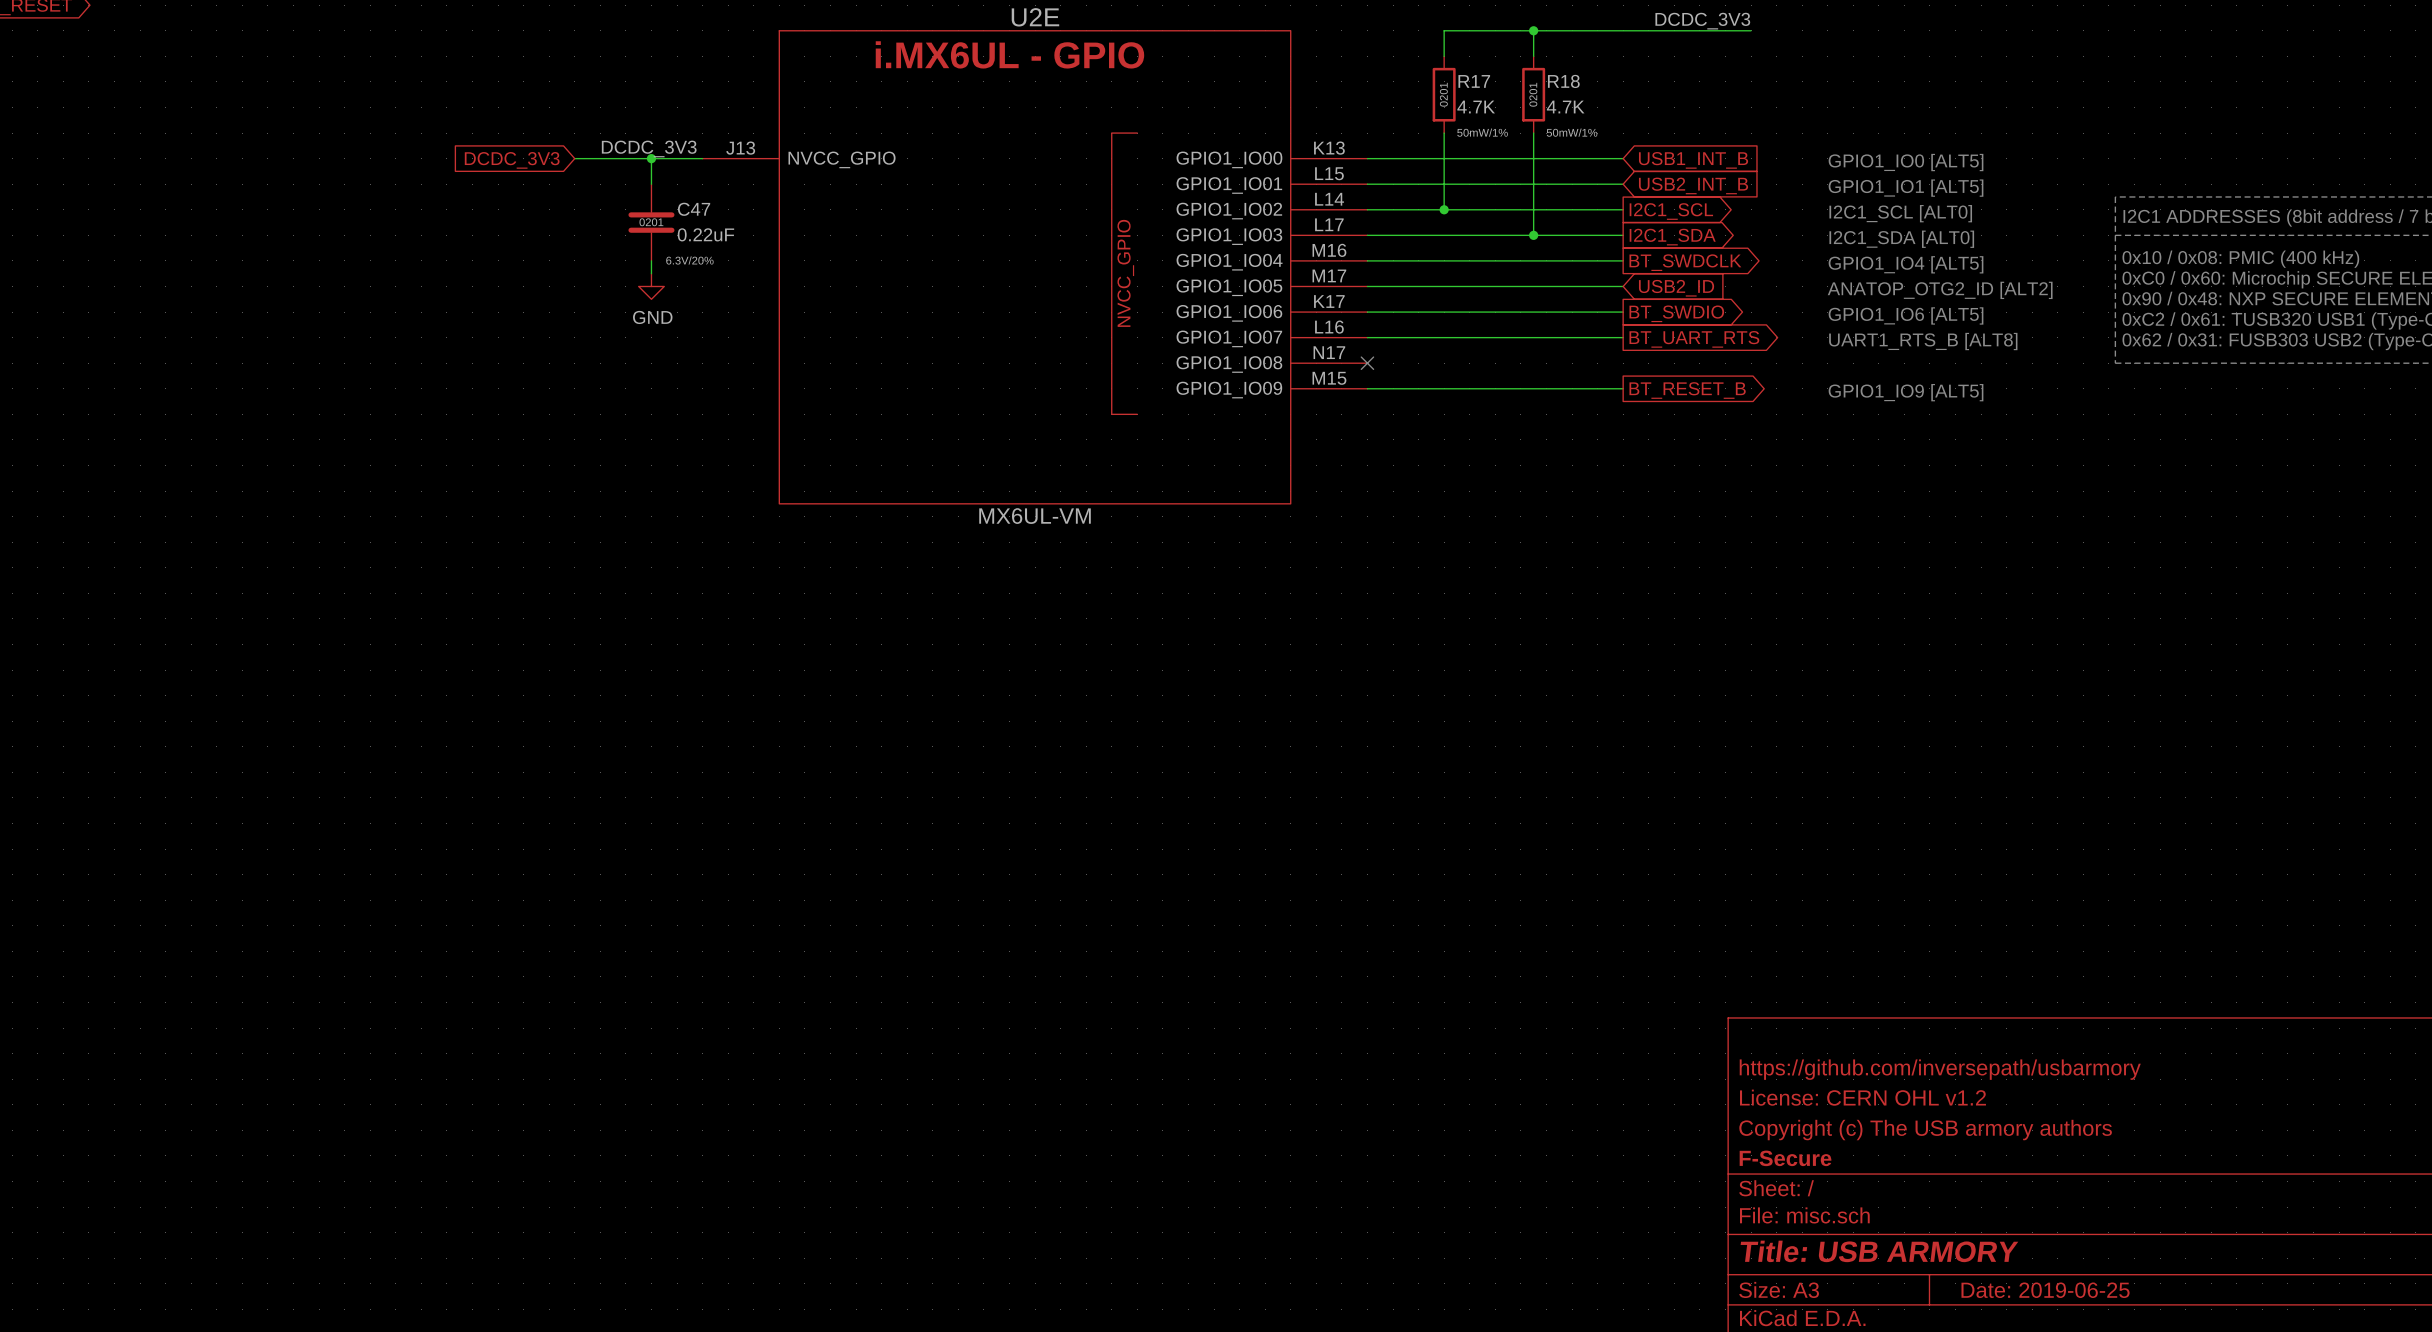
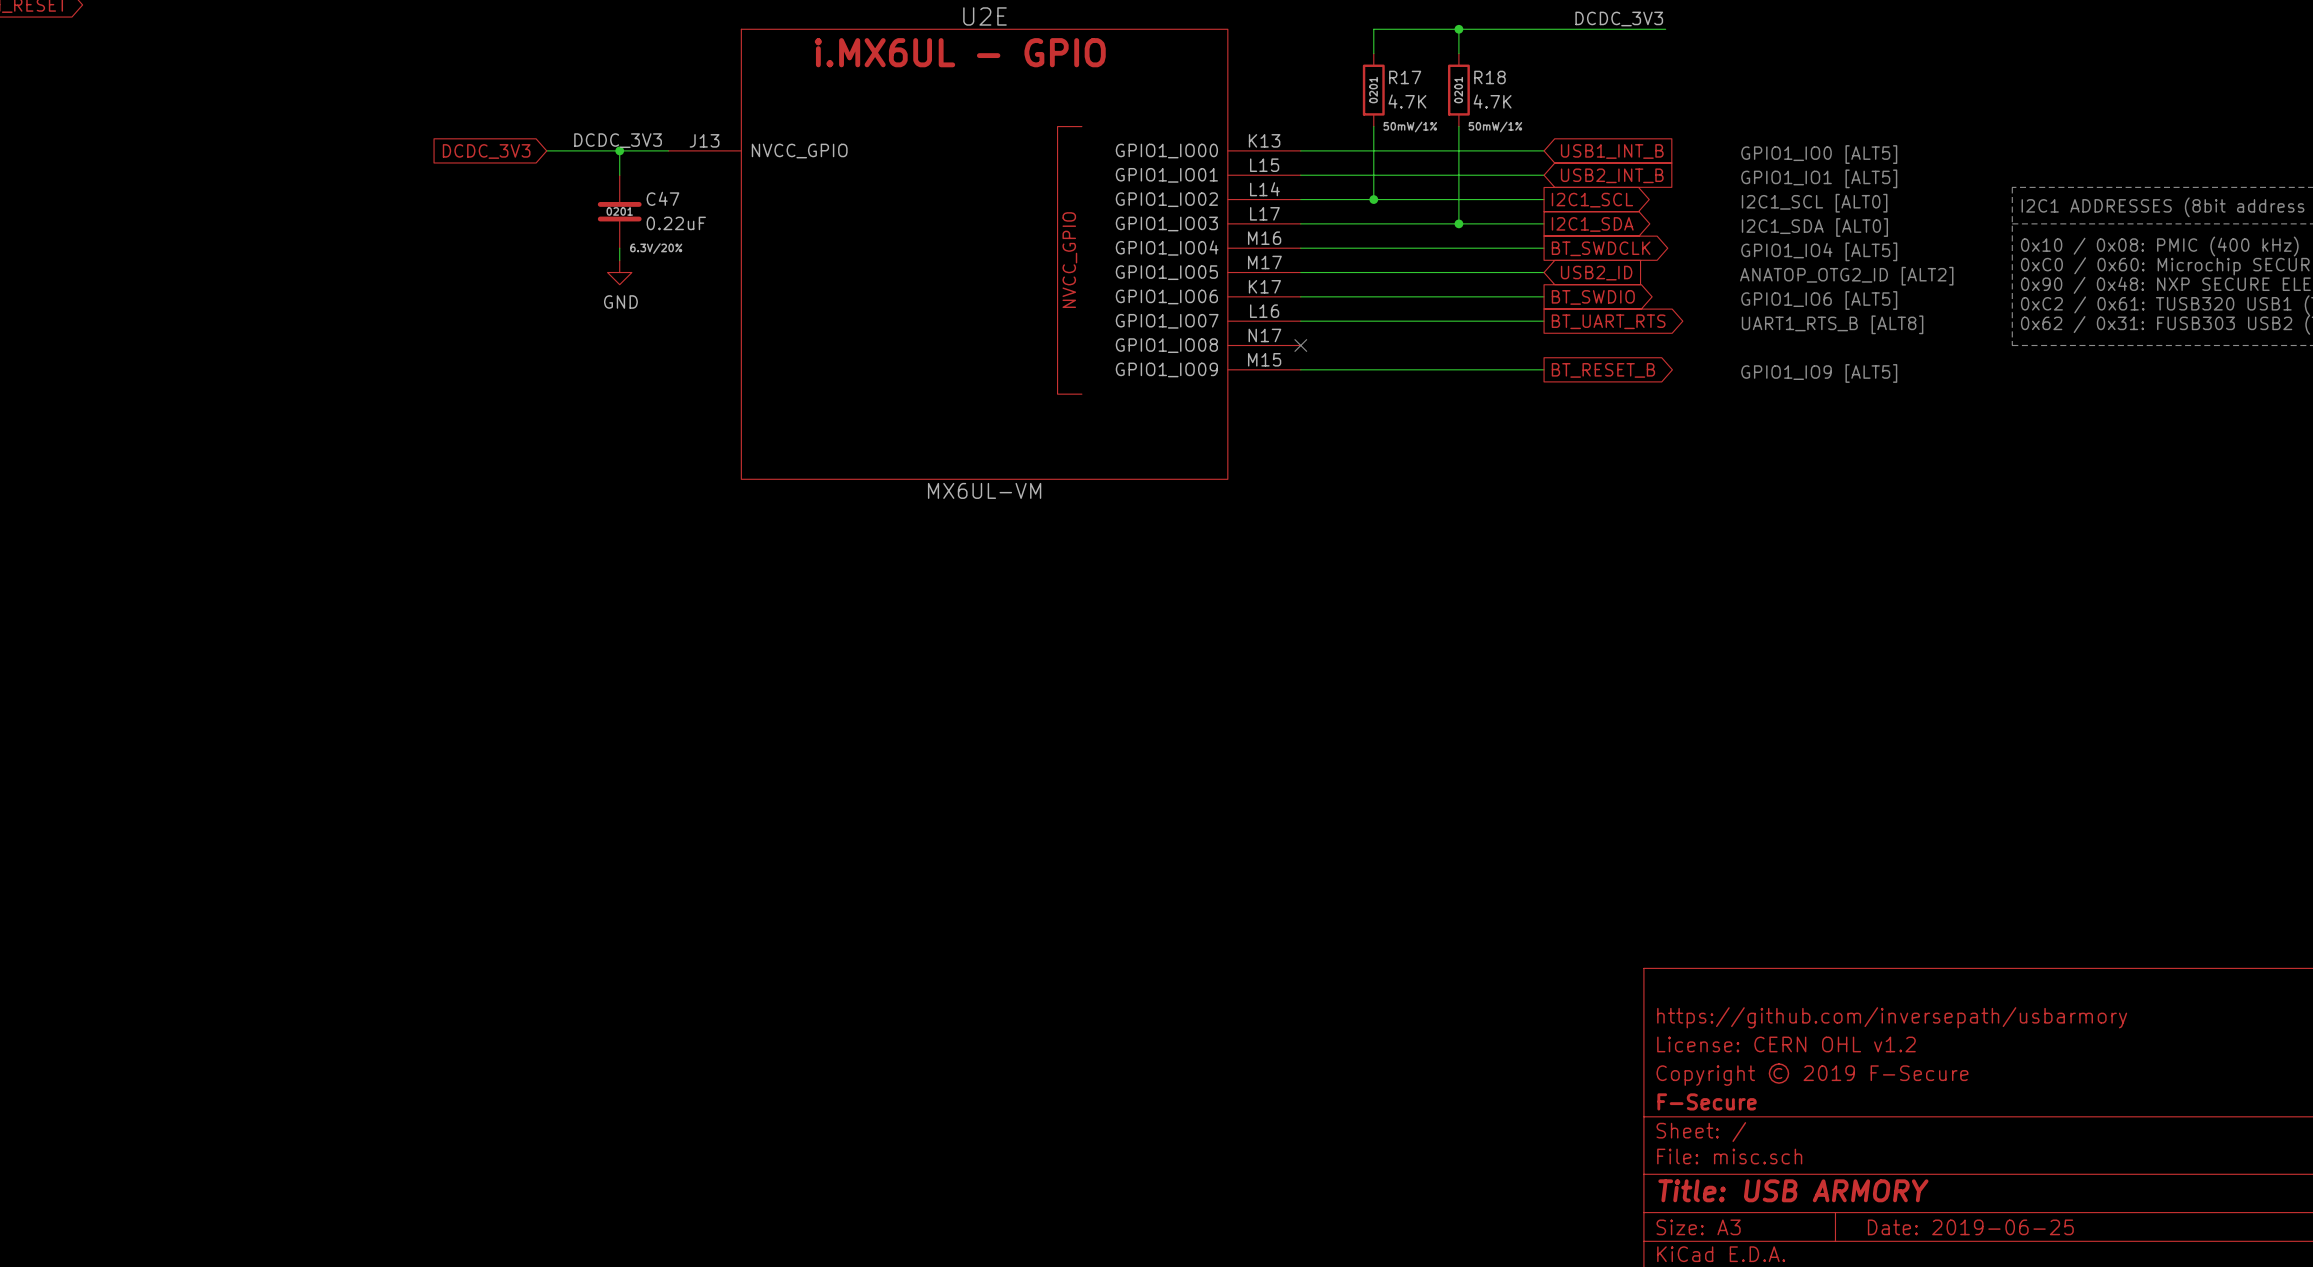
title block: Copyright (c) The USB armory authors (1925, 1130) -> Copyright © 2019 F-Secure (1812, 1074)

